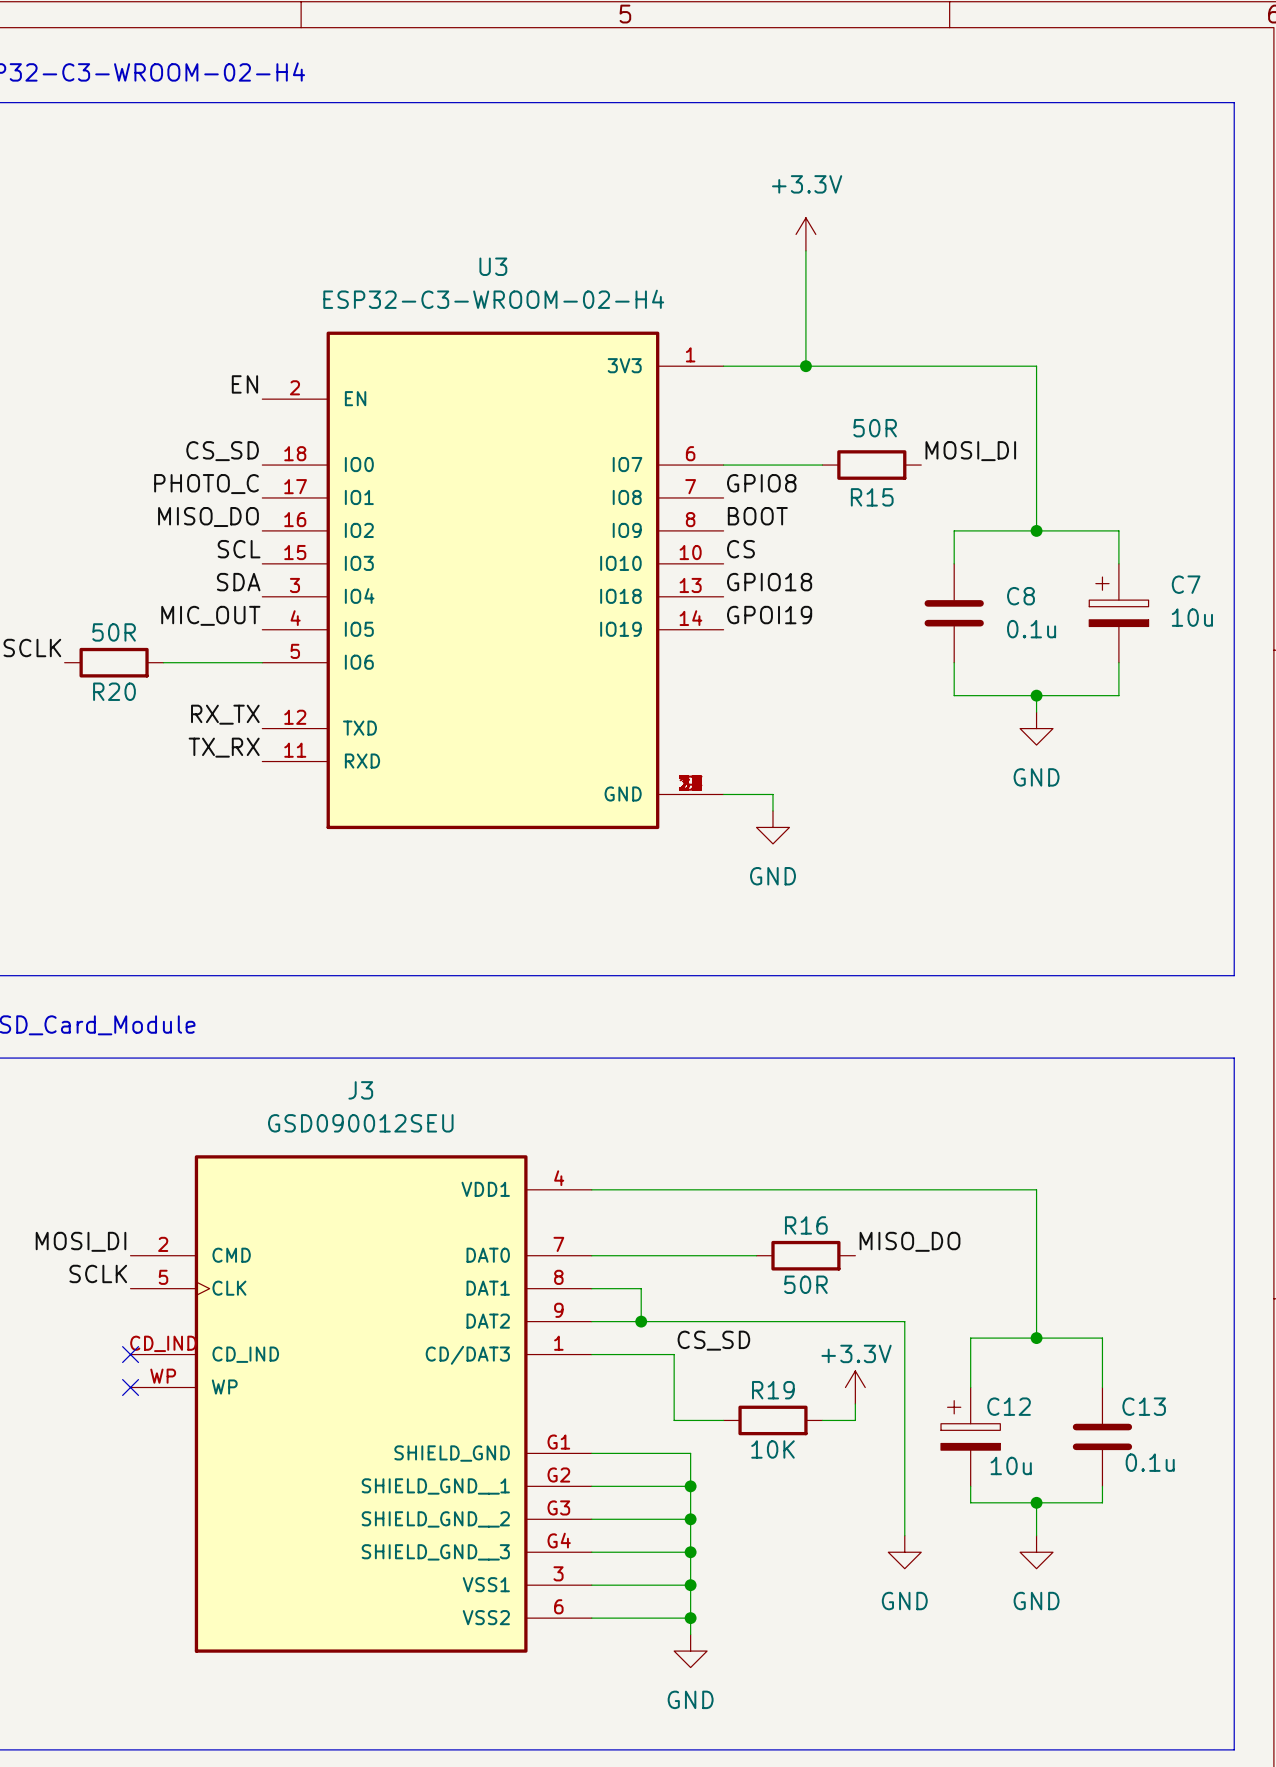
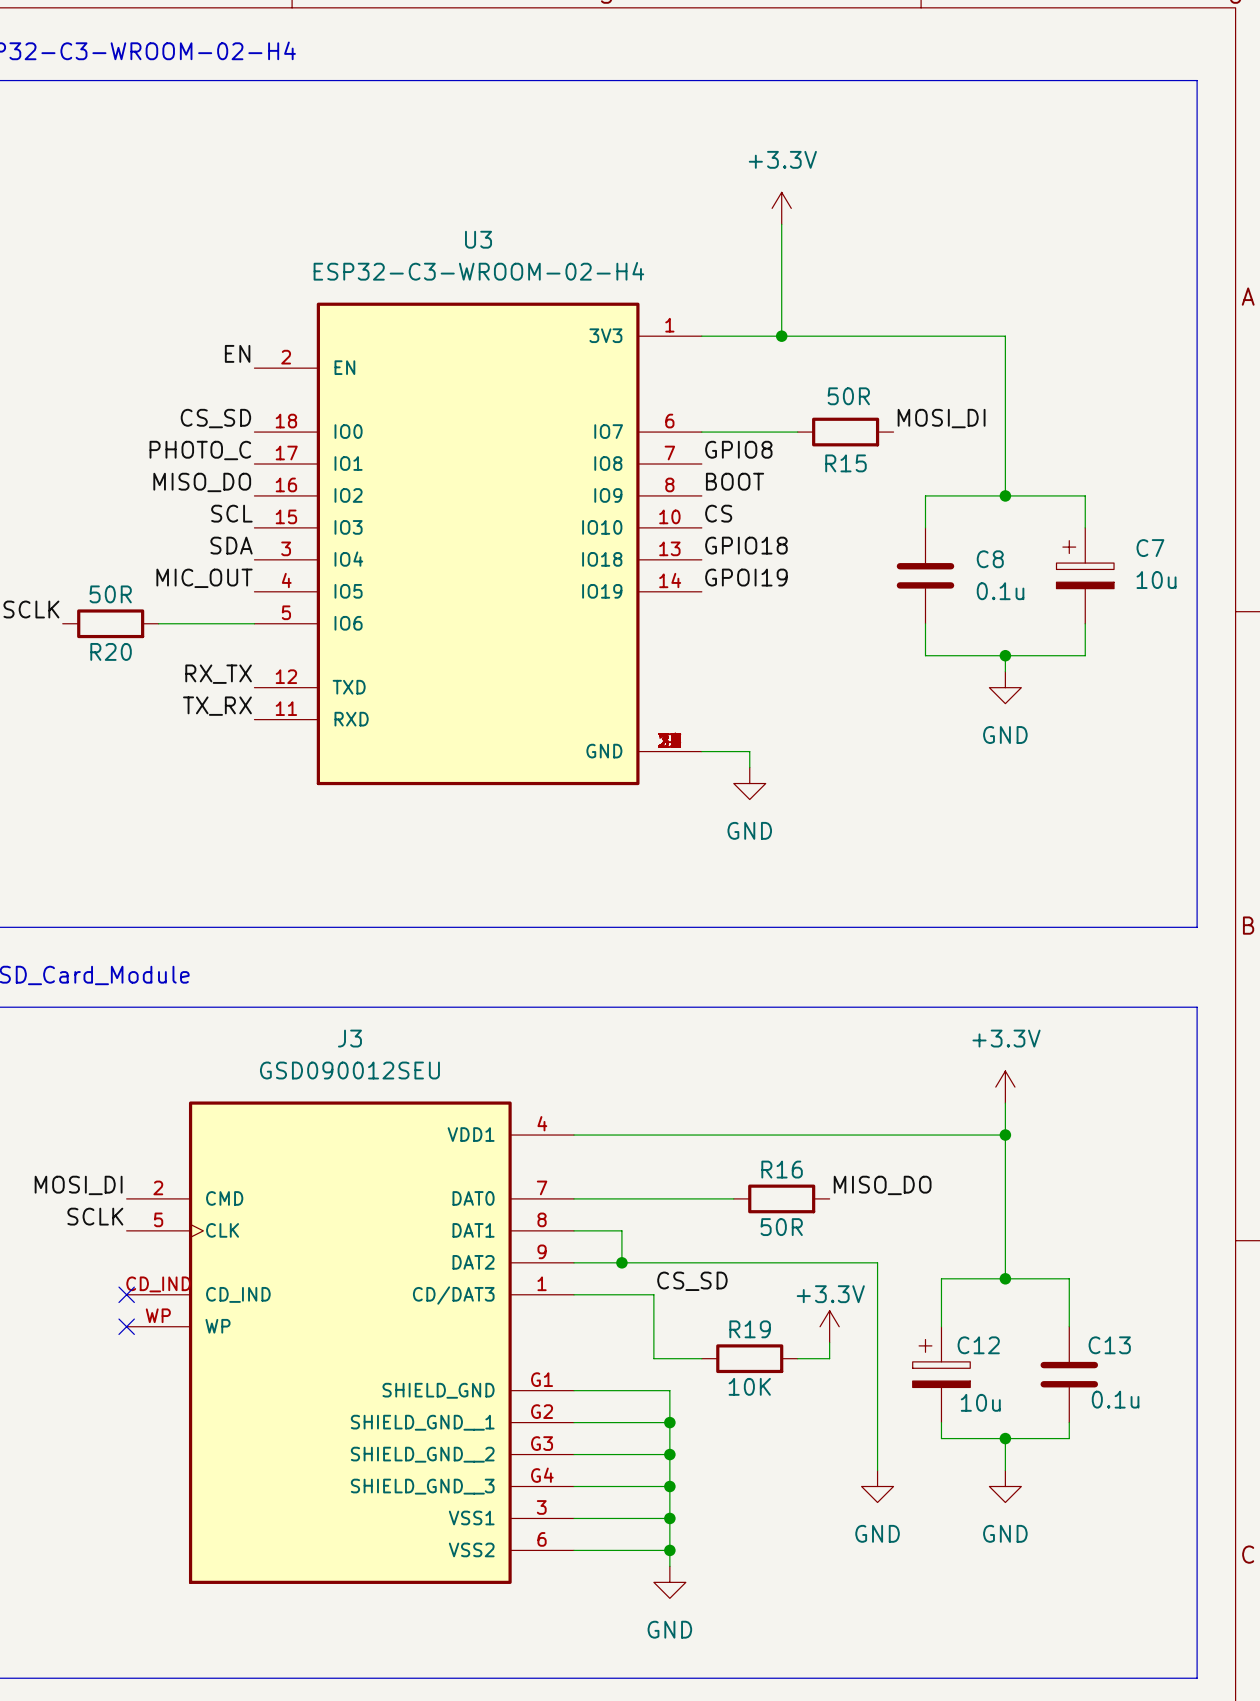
power symbol: none -> +3.3V (1005, 1087)
wire: none -> (1005, 1103) (1005, 1135)
junction: none -> (1005, 1135)

